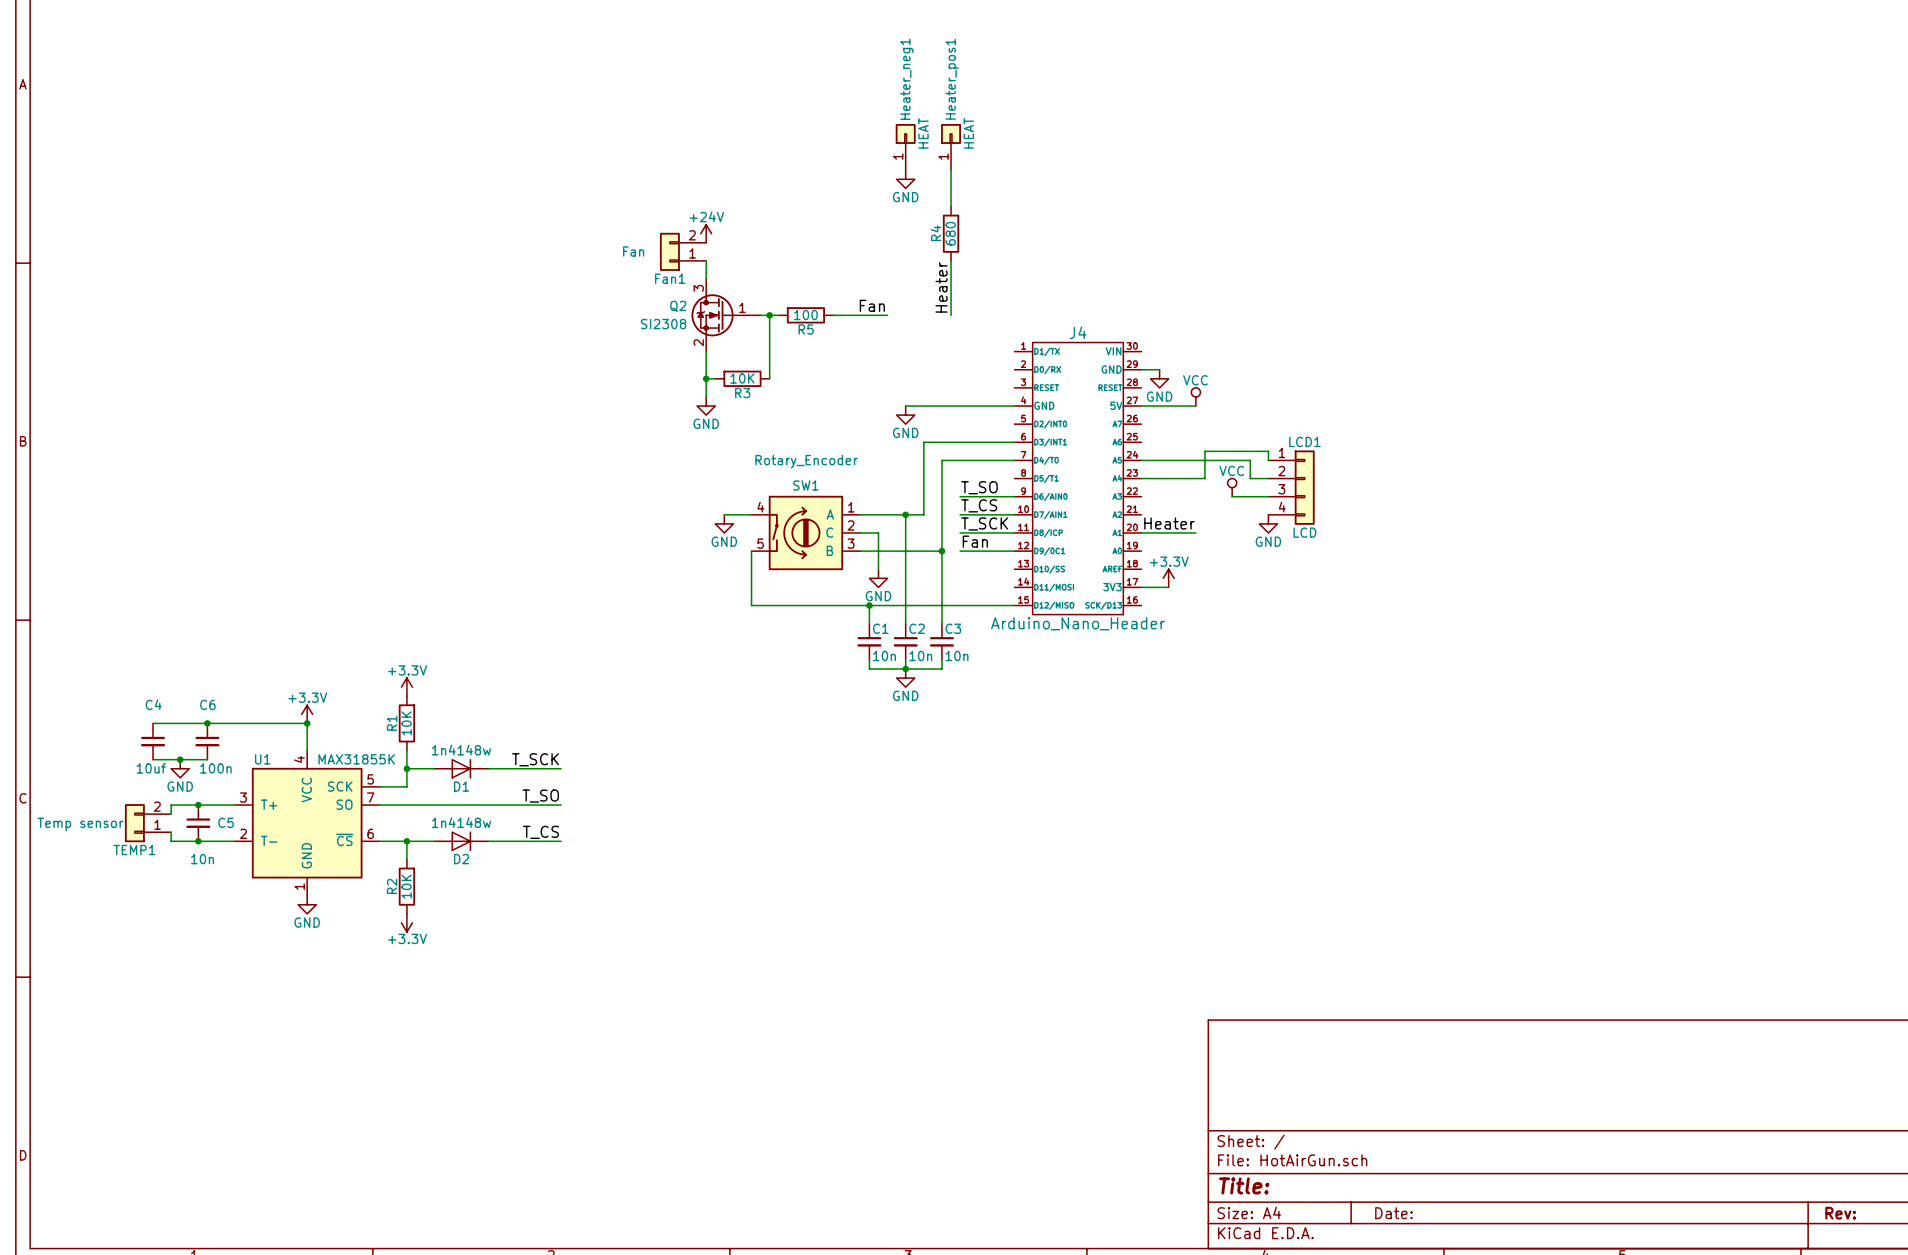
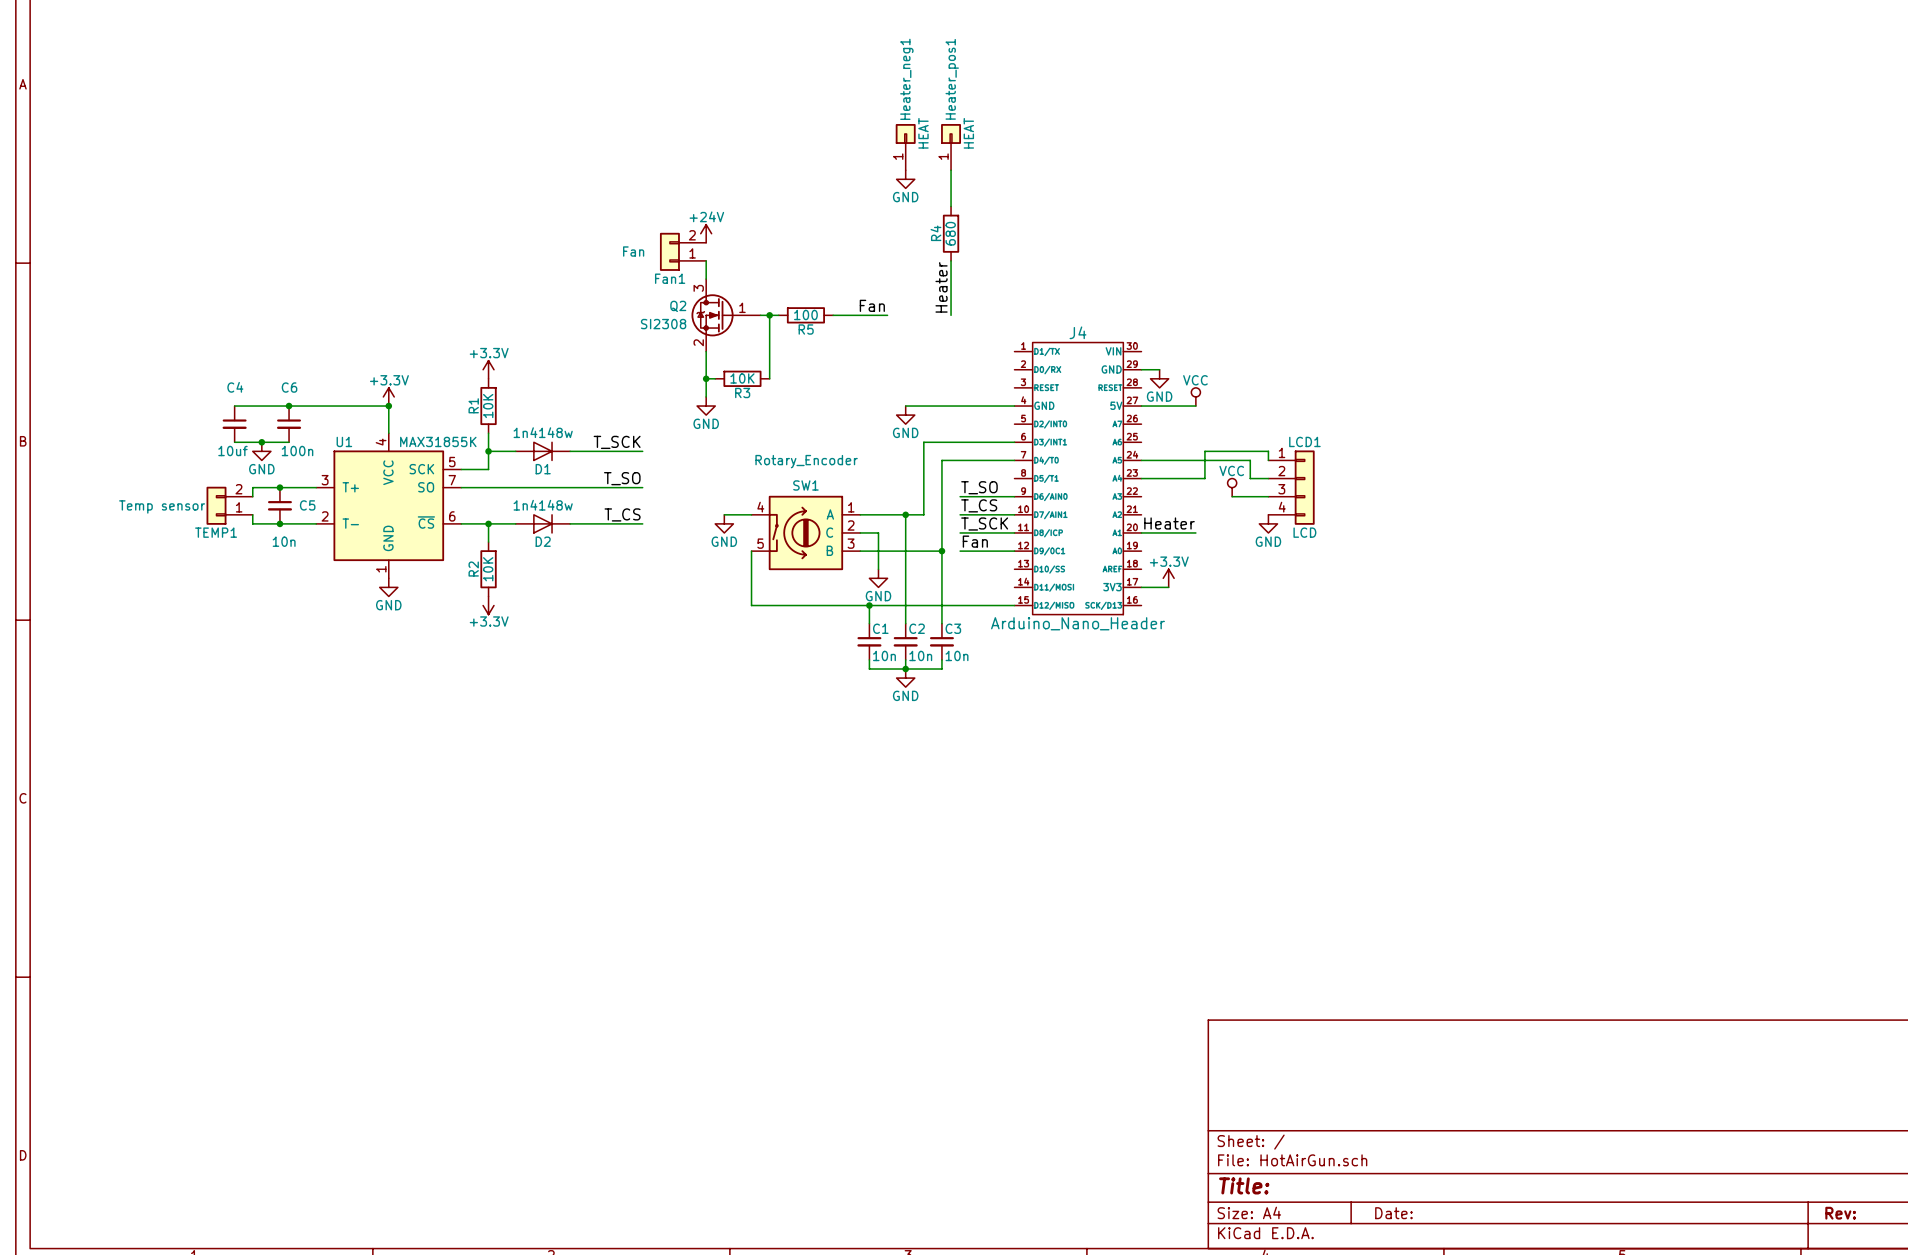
power symbol: none -> +3.3V (488, 369)
power symbol: none -> +3.3V (388, 396)
wire: none -> (234, 406) (388, 406) (388, 433)
junction: none -> (289, 406)
junction: none -> (388, 406)
wire: none -> (488, 433) (488, 469) (461, 469)
wire: none -> (234, 442) (289, 442)
junction: none -> (261, 442)
label: none -> T_SCK (617, 442)
power symbol: none -> GND (261, 451)
wire: none -> (488, 451) (515, 451)
junction: none -> (488, 451)
wire: none -> (570, 451) (642, 451)
label: none -> T_SO (622, 478)
junction: none -> (279, 487)
wire: none -> (316, 487) (252, 487) (252, 496)
wire: none -> (461, 487) (642, 487)
wire: none -> (252, 514) (252, 523) (316, 523)
label: none -> T_CS (622, 514)
junction: none -> (279, 523)
wire: none -> (461, 523) (515, 523)
wire: none -> (488, 523) (488, 542)
junction: none -> (488, 523)
wire: none -> (570, 523) (642, 523)
power symbol: none -> GND (388, 587)
power symbol: none -> +3.3V (488, 605)
power symbol: +3.3V (406, 687) -> none
power symbol: +3.3V (307, 714) -> none
wire: (153, 723) (307, 723) (307, 750) -> none
junction: (207, 723) -> none
junction: (307, 723) -> none
R1 position: (406, 723) -> (488, 406)
C4 position: (153, 741) -> (234, 424)
C6 position: (207, 741) -> (289, 424)
wire: (406, 750) (406, 786) (379, 786) -> none
wire: (153, 759) (207, 759) -> none
junction: (180, 759) -> none
label: T_SCK (535, 759) -> none
power symbol: GND (180, 768) -> none
wire: (406, 768) (434, 768) -> none
junction: (406, 768) -> none
D1 position: (461, 768) -> (542, 451)
wire: (488, 768) (561, 768) -> none
label: T_SO (540, 796) -> none
junction: (198, 805) -> none
wire: (234, 805) (171, 805) (171, 814) -> none
wire: (379, 805) (561, 805) -> none
TEMP1 position: (148, 823) -> (229, 505)
C5 position: (198, 823) -> (279, 505)
U1 position: (307, 823) -> (388, 505)
wire: (171, 832) (171, 841) (234, 841) -> none
label: T_CS (540, 832) -> none
junction: (198, 841) -> none
wire: (379, 841) (434, 841) -> none
wire: (406, 841) (406, 859) -> none
junction: (406, 841) -> none
D2 position: (461, 841) -> (542, 523)
wire: (488, 841) (561, 841) -> none
R2 position: (406, 886) -> (488, 569)
power symbol: GND (307, 904) -> none
power symbol: +3.3V (406, 922) -> none

